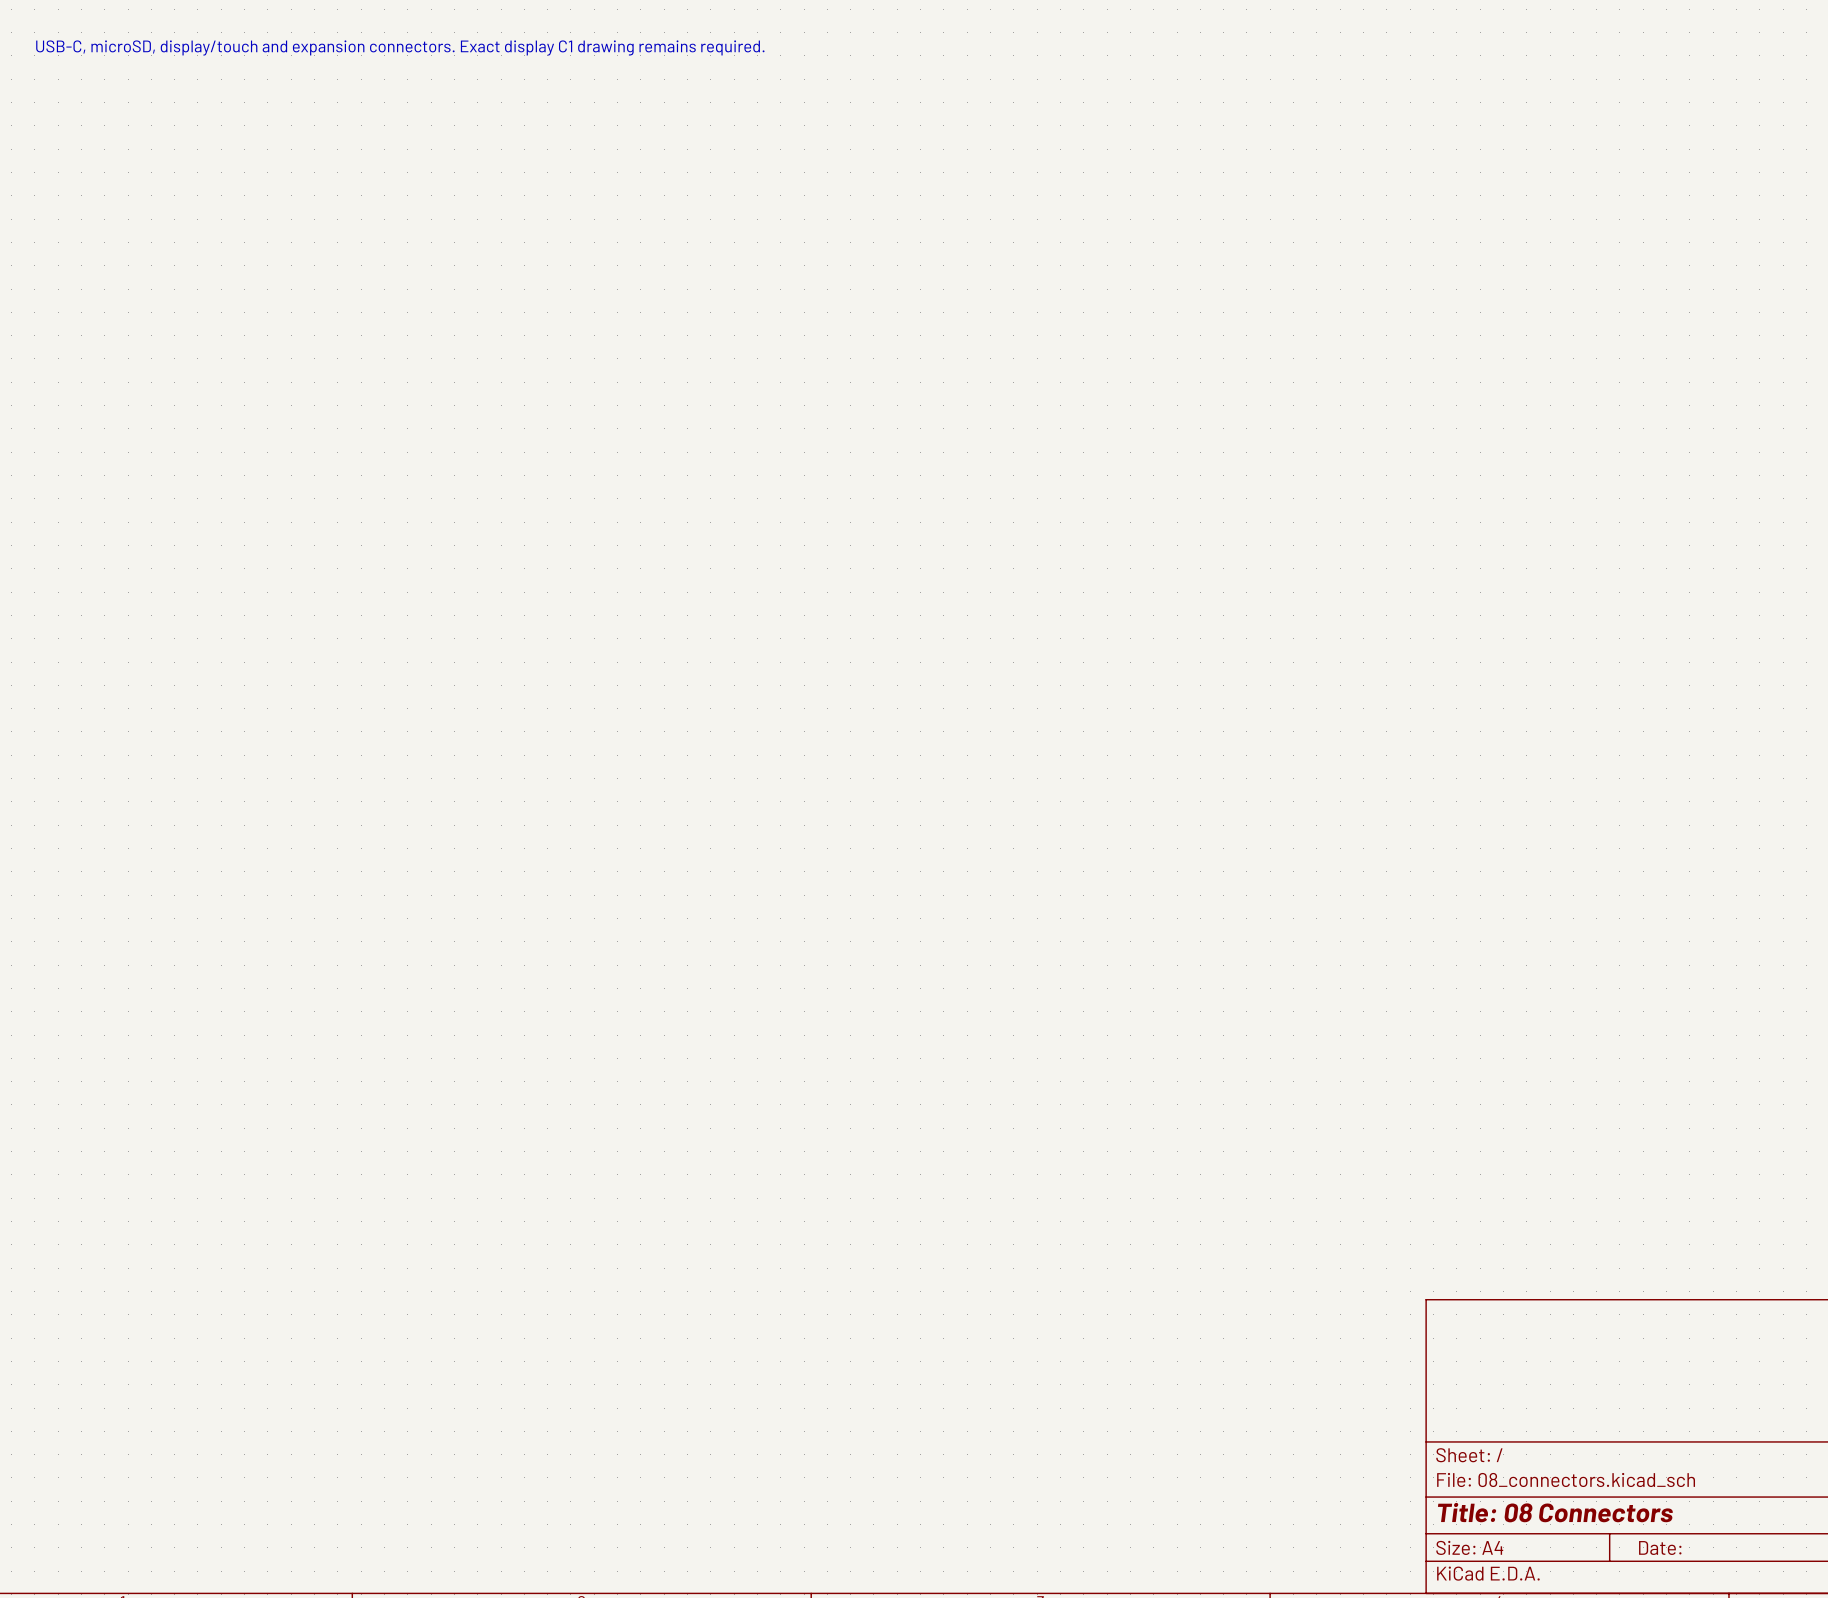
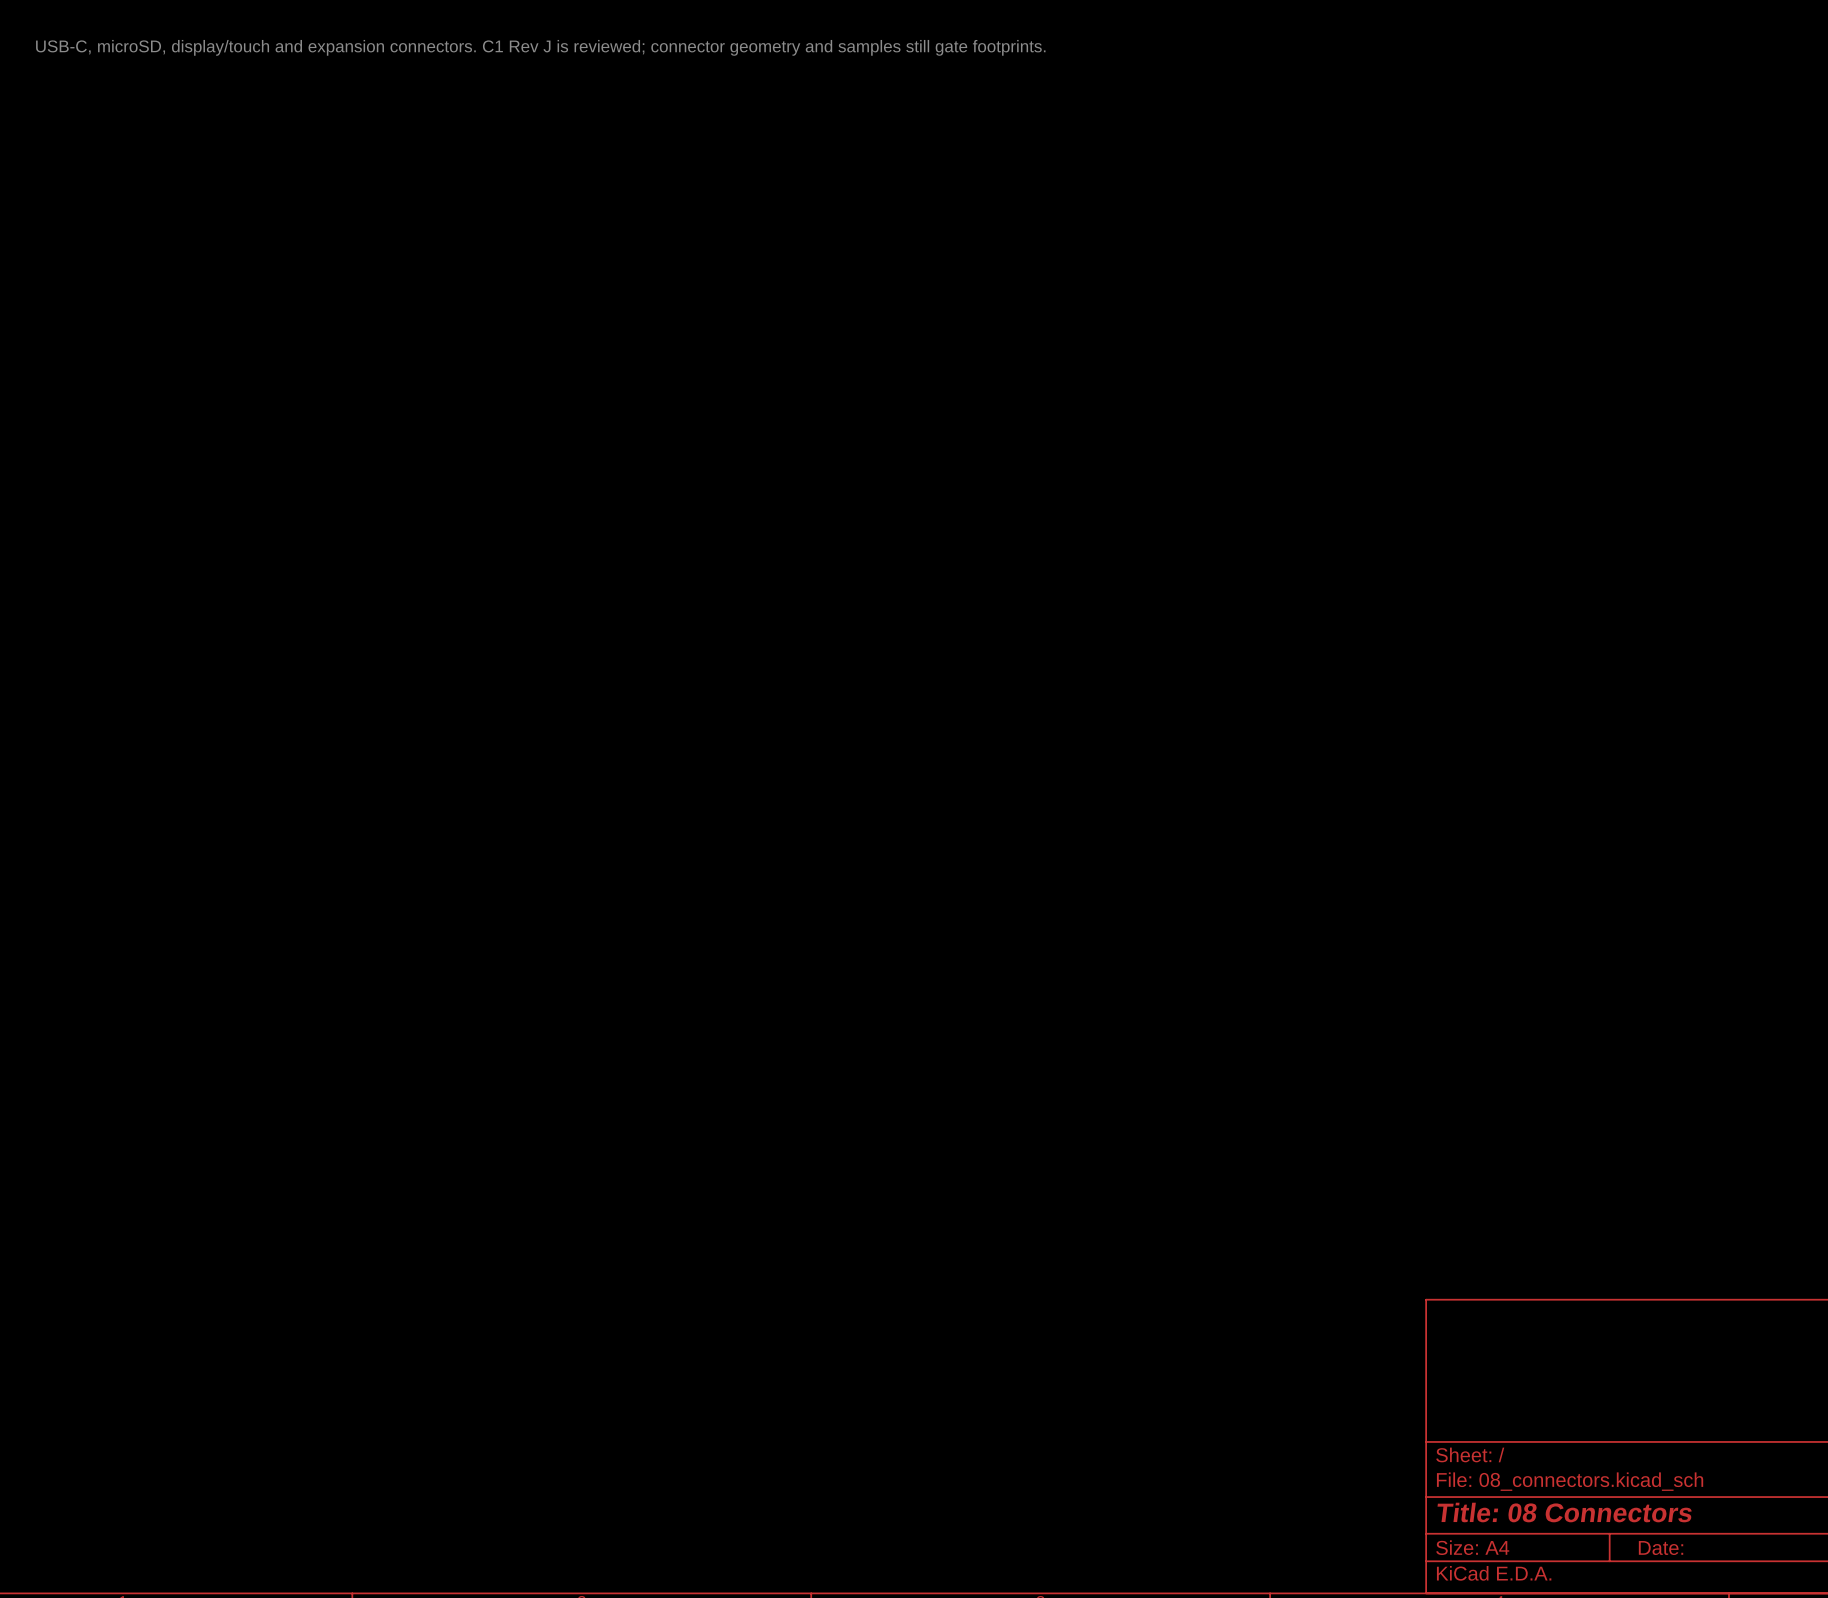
text: USB-C, microSD, display/touch and expansion connectors. Exact display C1 drawing remains required. (400, 47) -> USB-C, microSD, display/touch and expansion connectors. C1 Rev J is reviewed; connector geometry and samples still gate footprints. (540, 47)

